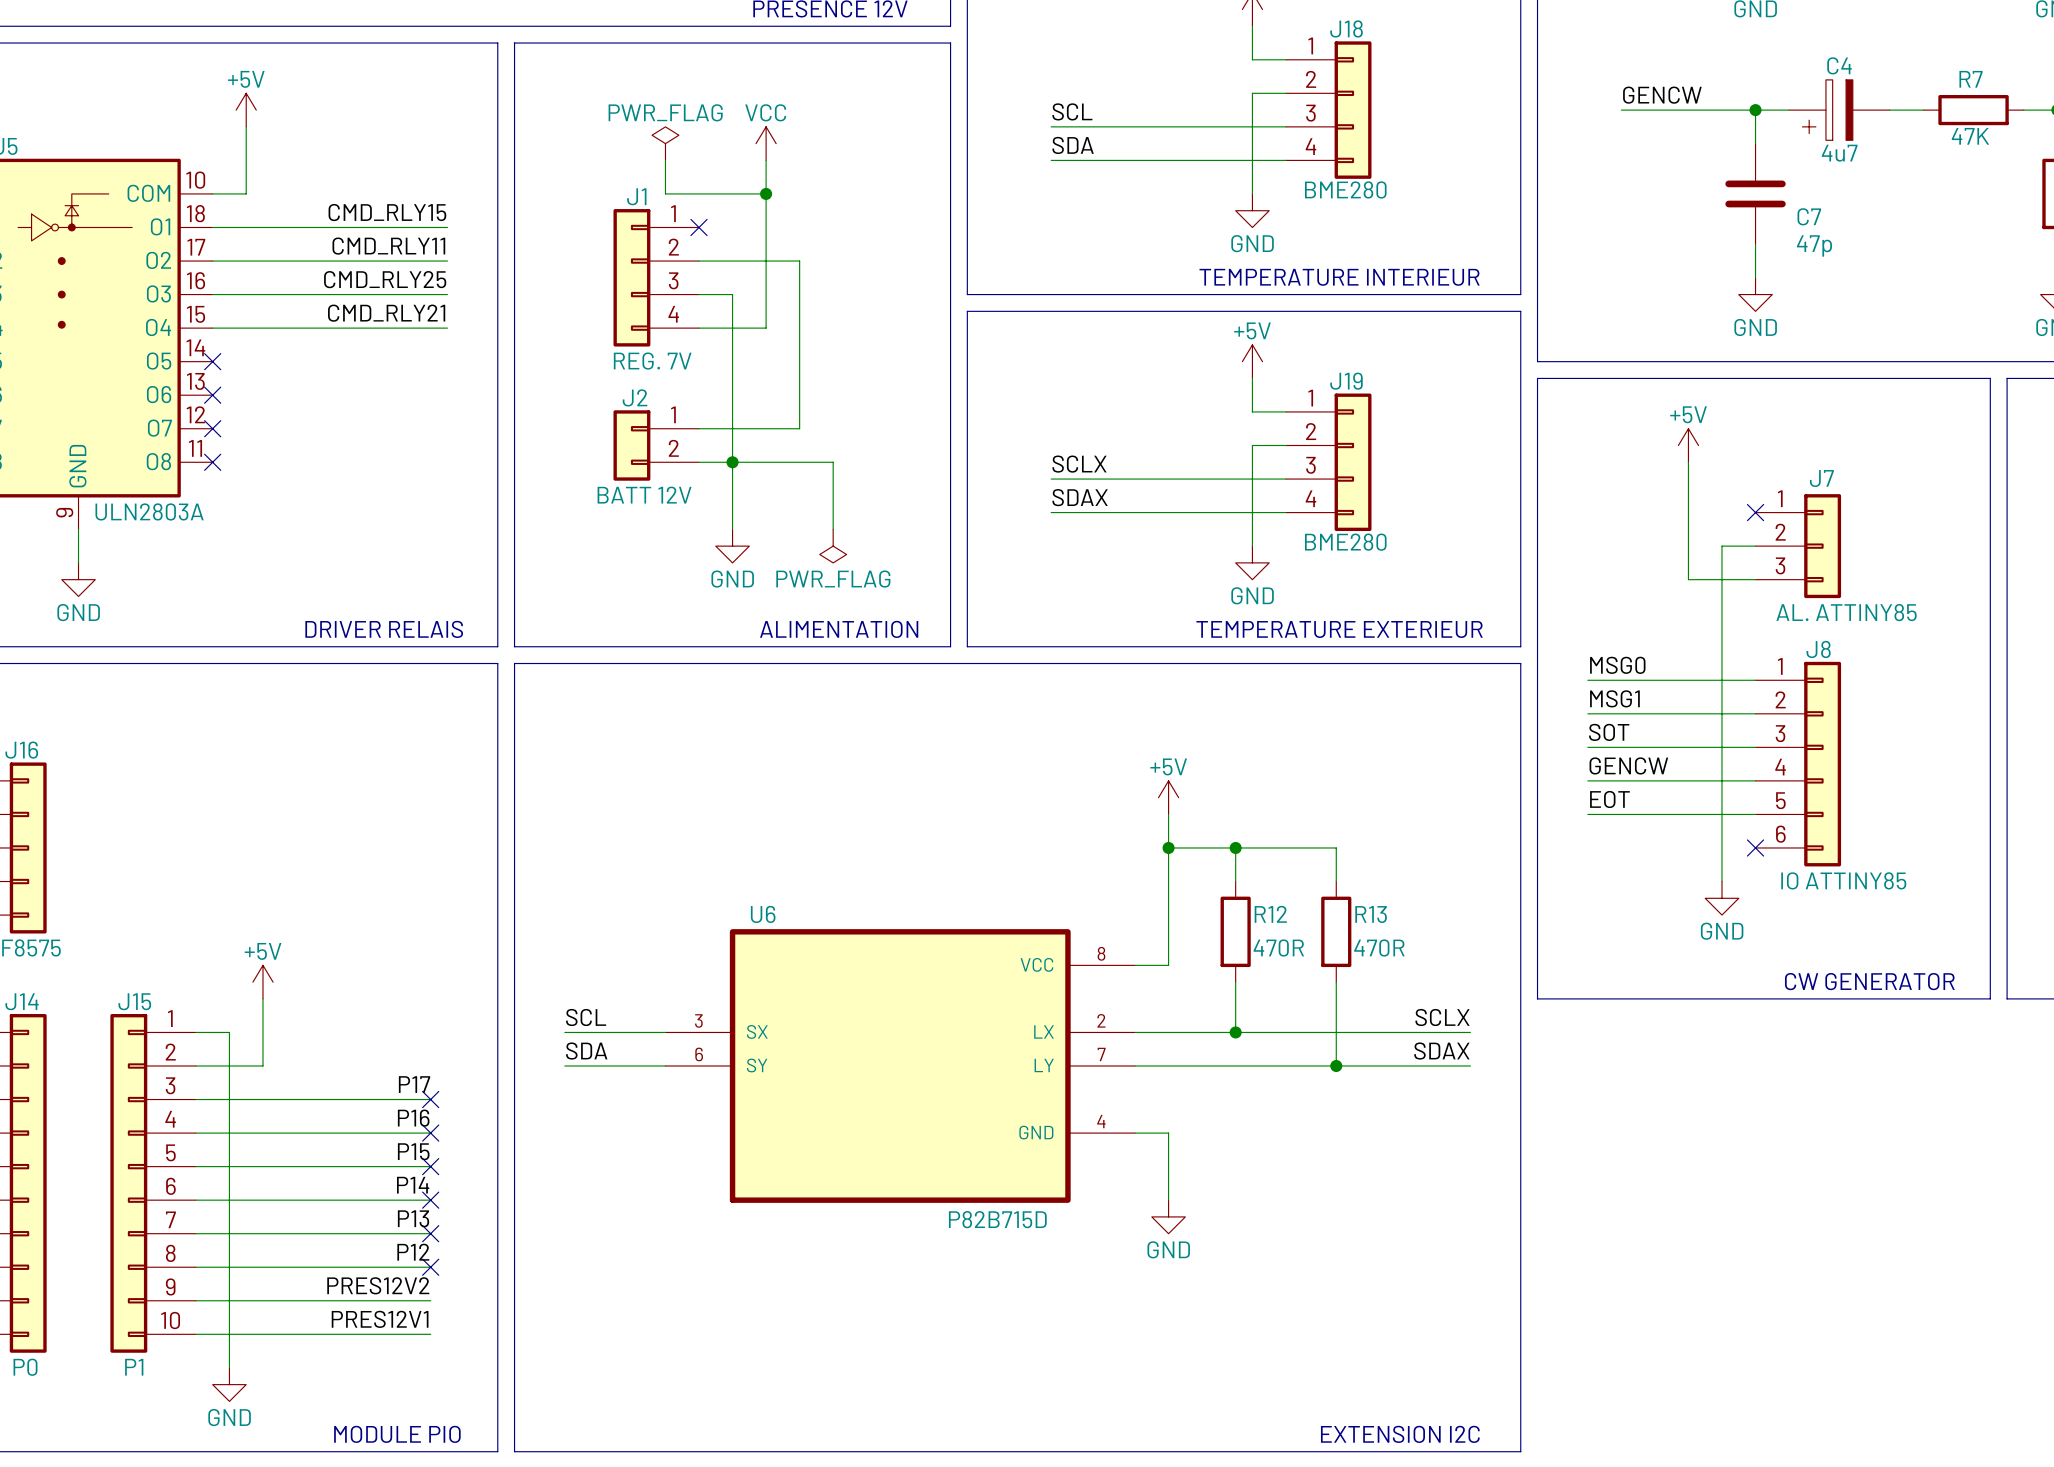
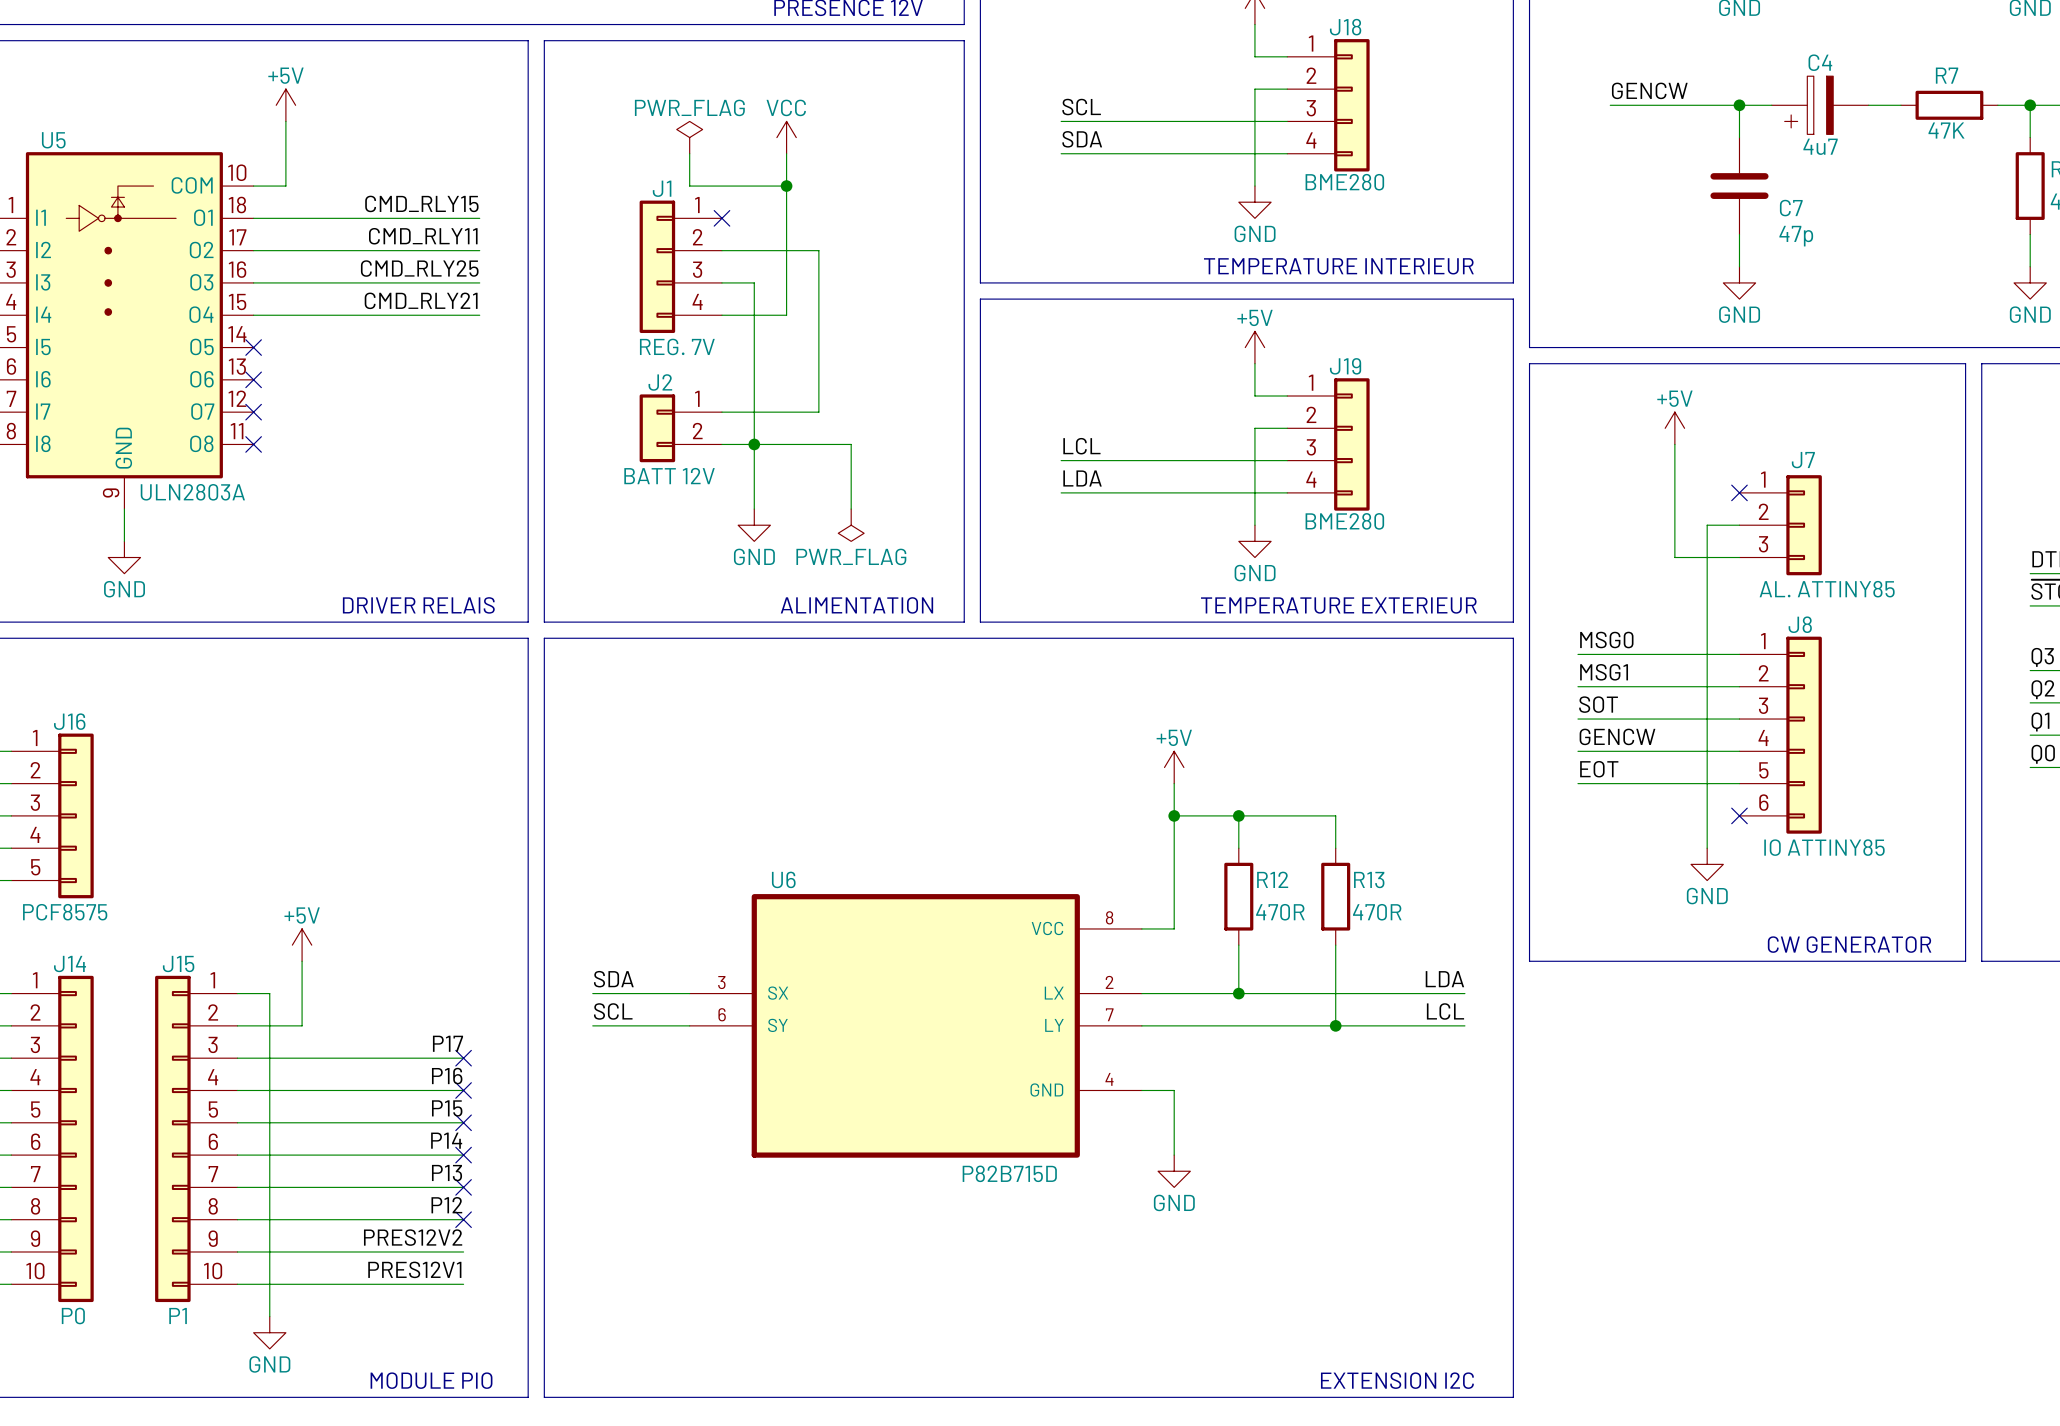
label: SCLX (1079, 464) -> LCL (1081, 446)
label: SDAX (1080, 497) -> LDA (1082, 478)
label: SCL (586, 1017) -> SDA (613, 979)
label: SCLX (1442, 1017) -> LDA (1444, 979)
label: SDA (586, 1051) -> SCL (613, 1011)
label: SDAX (1441, 1051) -> LCL (1445, 1011)

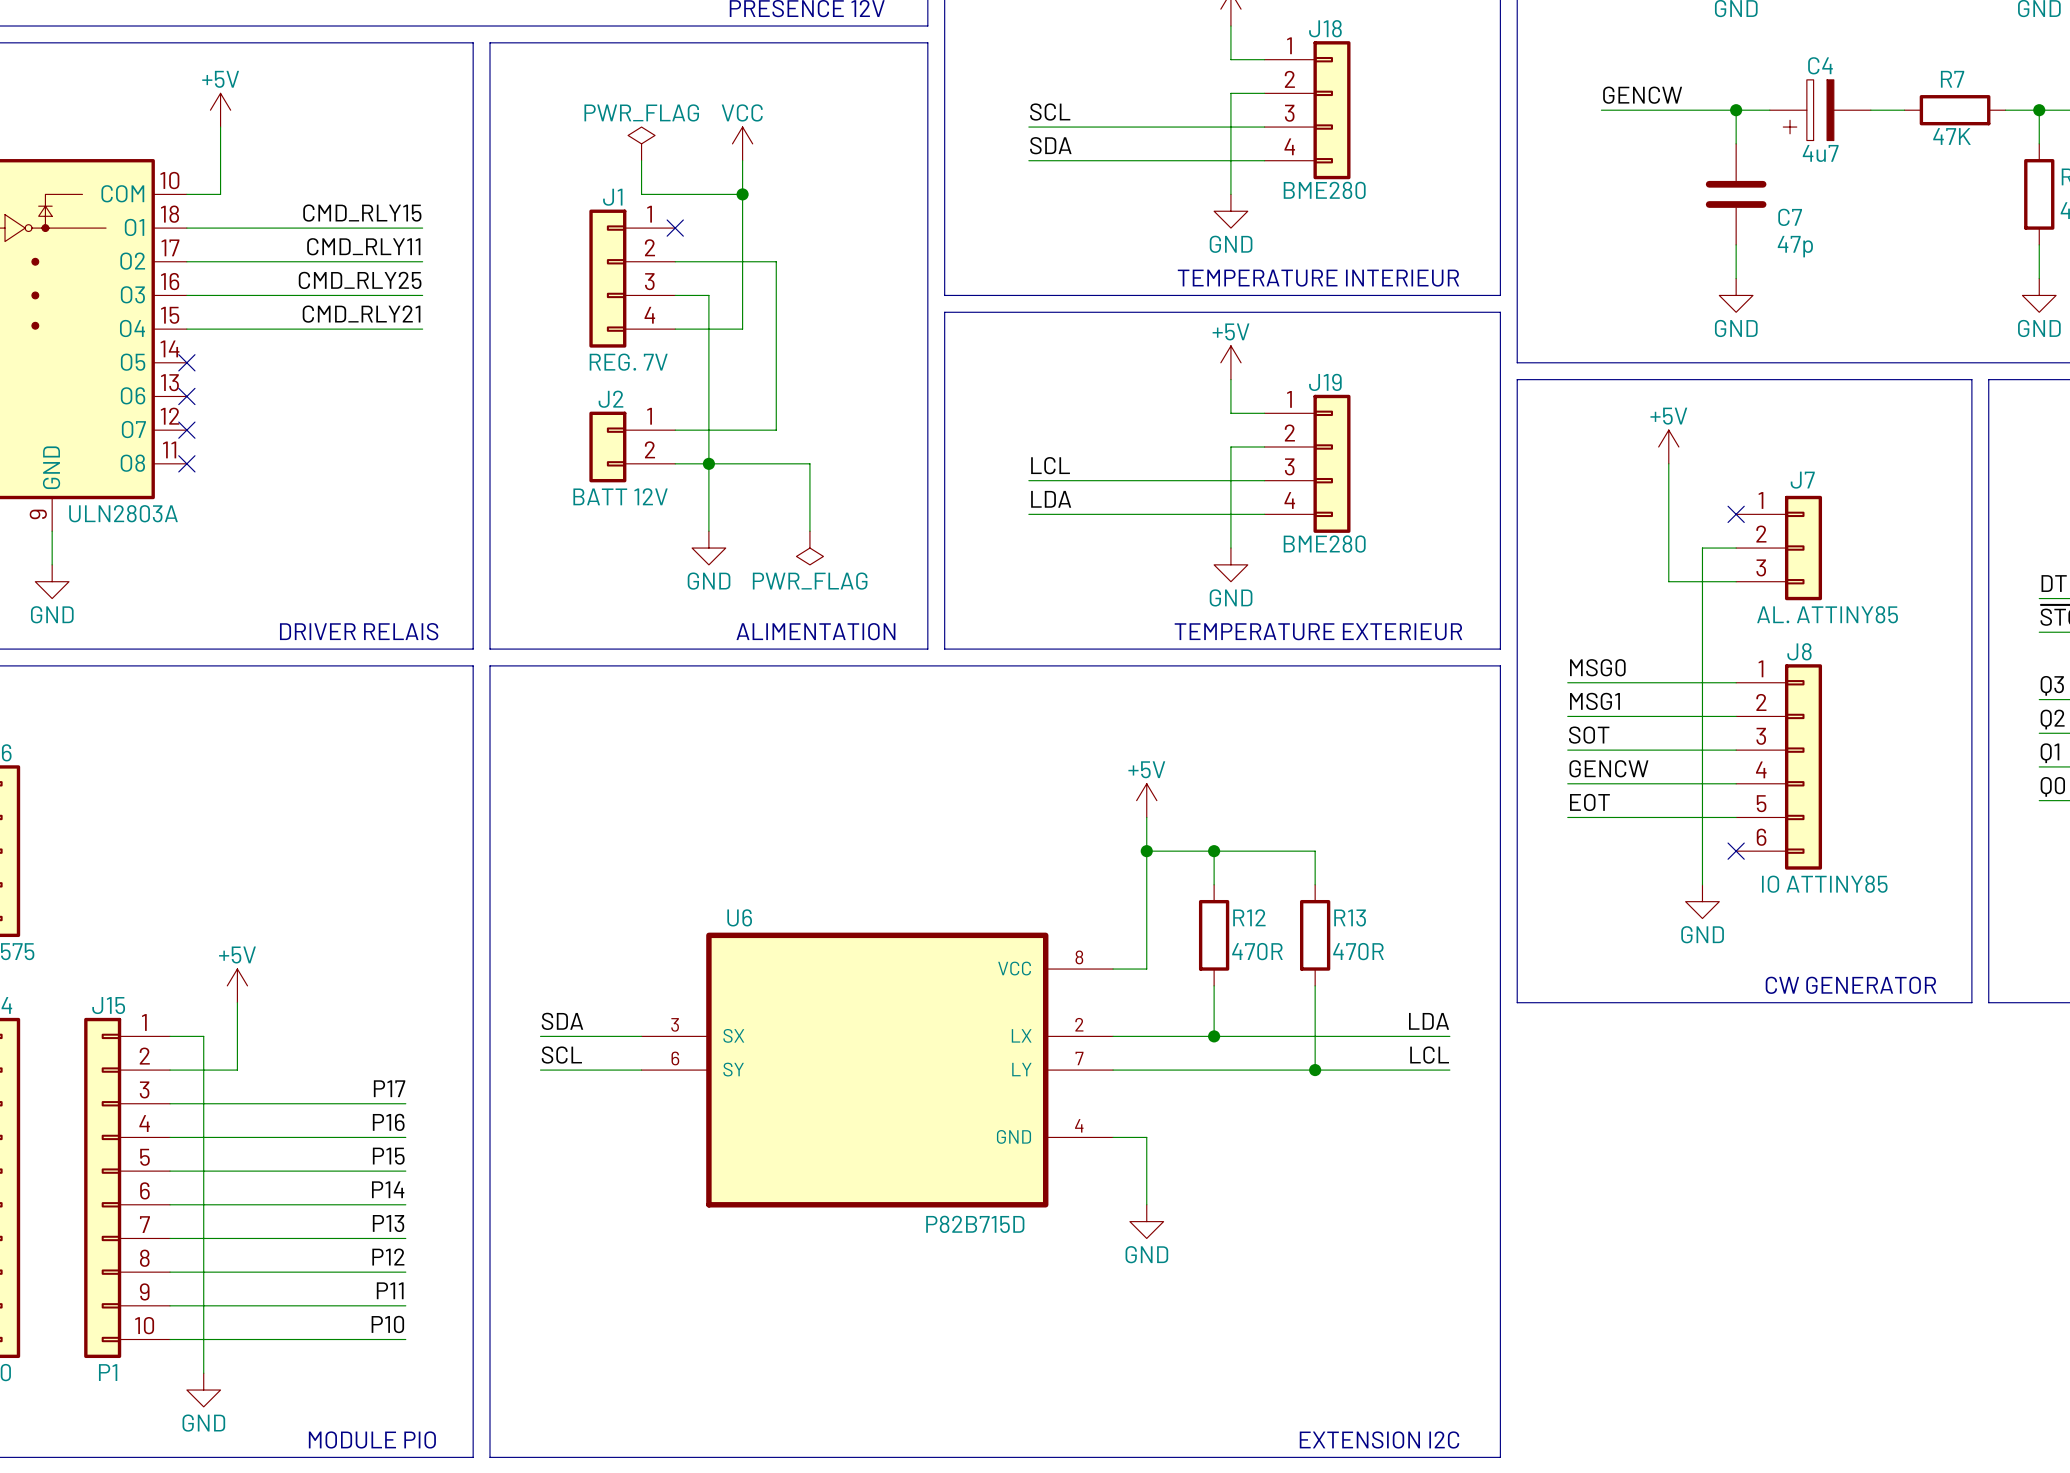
no-connect mark: (463, 1058) -> none
no-connect mark: (463, 1090) -> none
no-connect mark: (463, 1122) -> none
no-connect mark: (463, 1155) -> none
no-connect mark: (463, 1187) -> none
no-connect mark: (463, 1219) -> none
label: PRES12V2 (413, 1237) -> P11 (390, 1290)
label: PRES12V1 (414, 1269) -> P10 (387, 1324)

